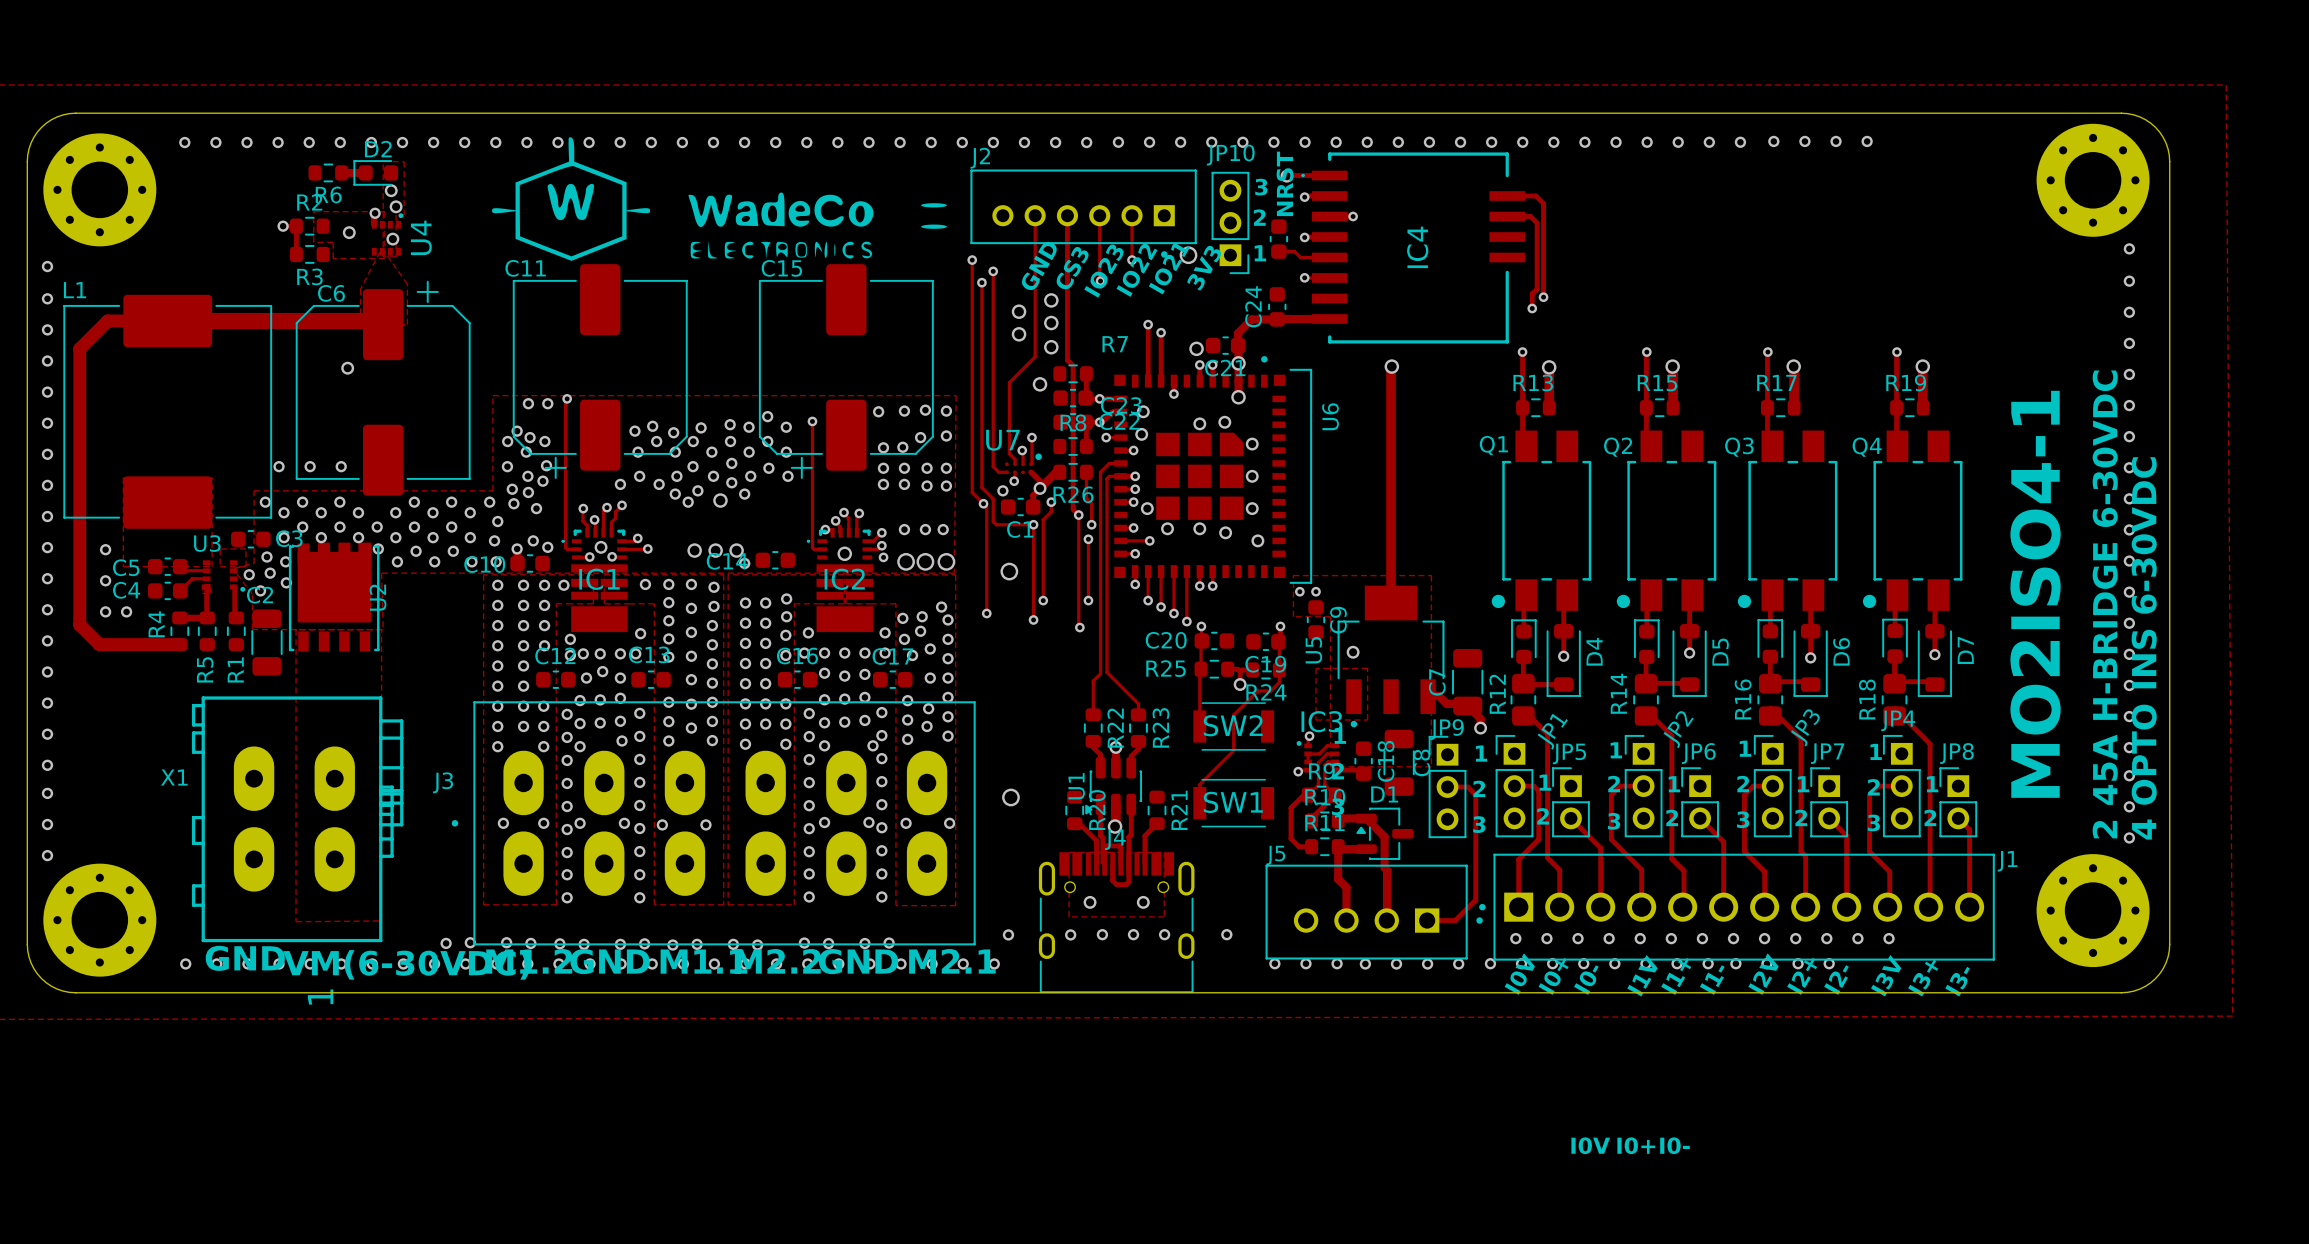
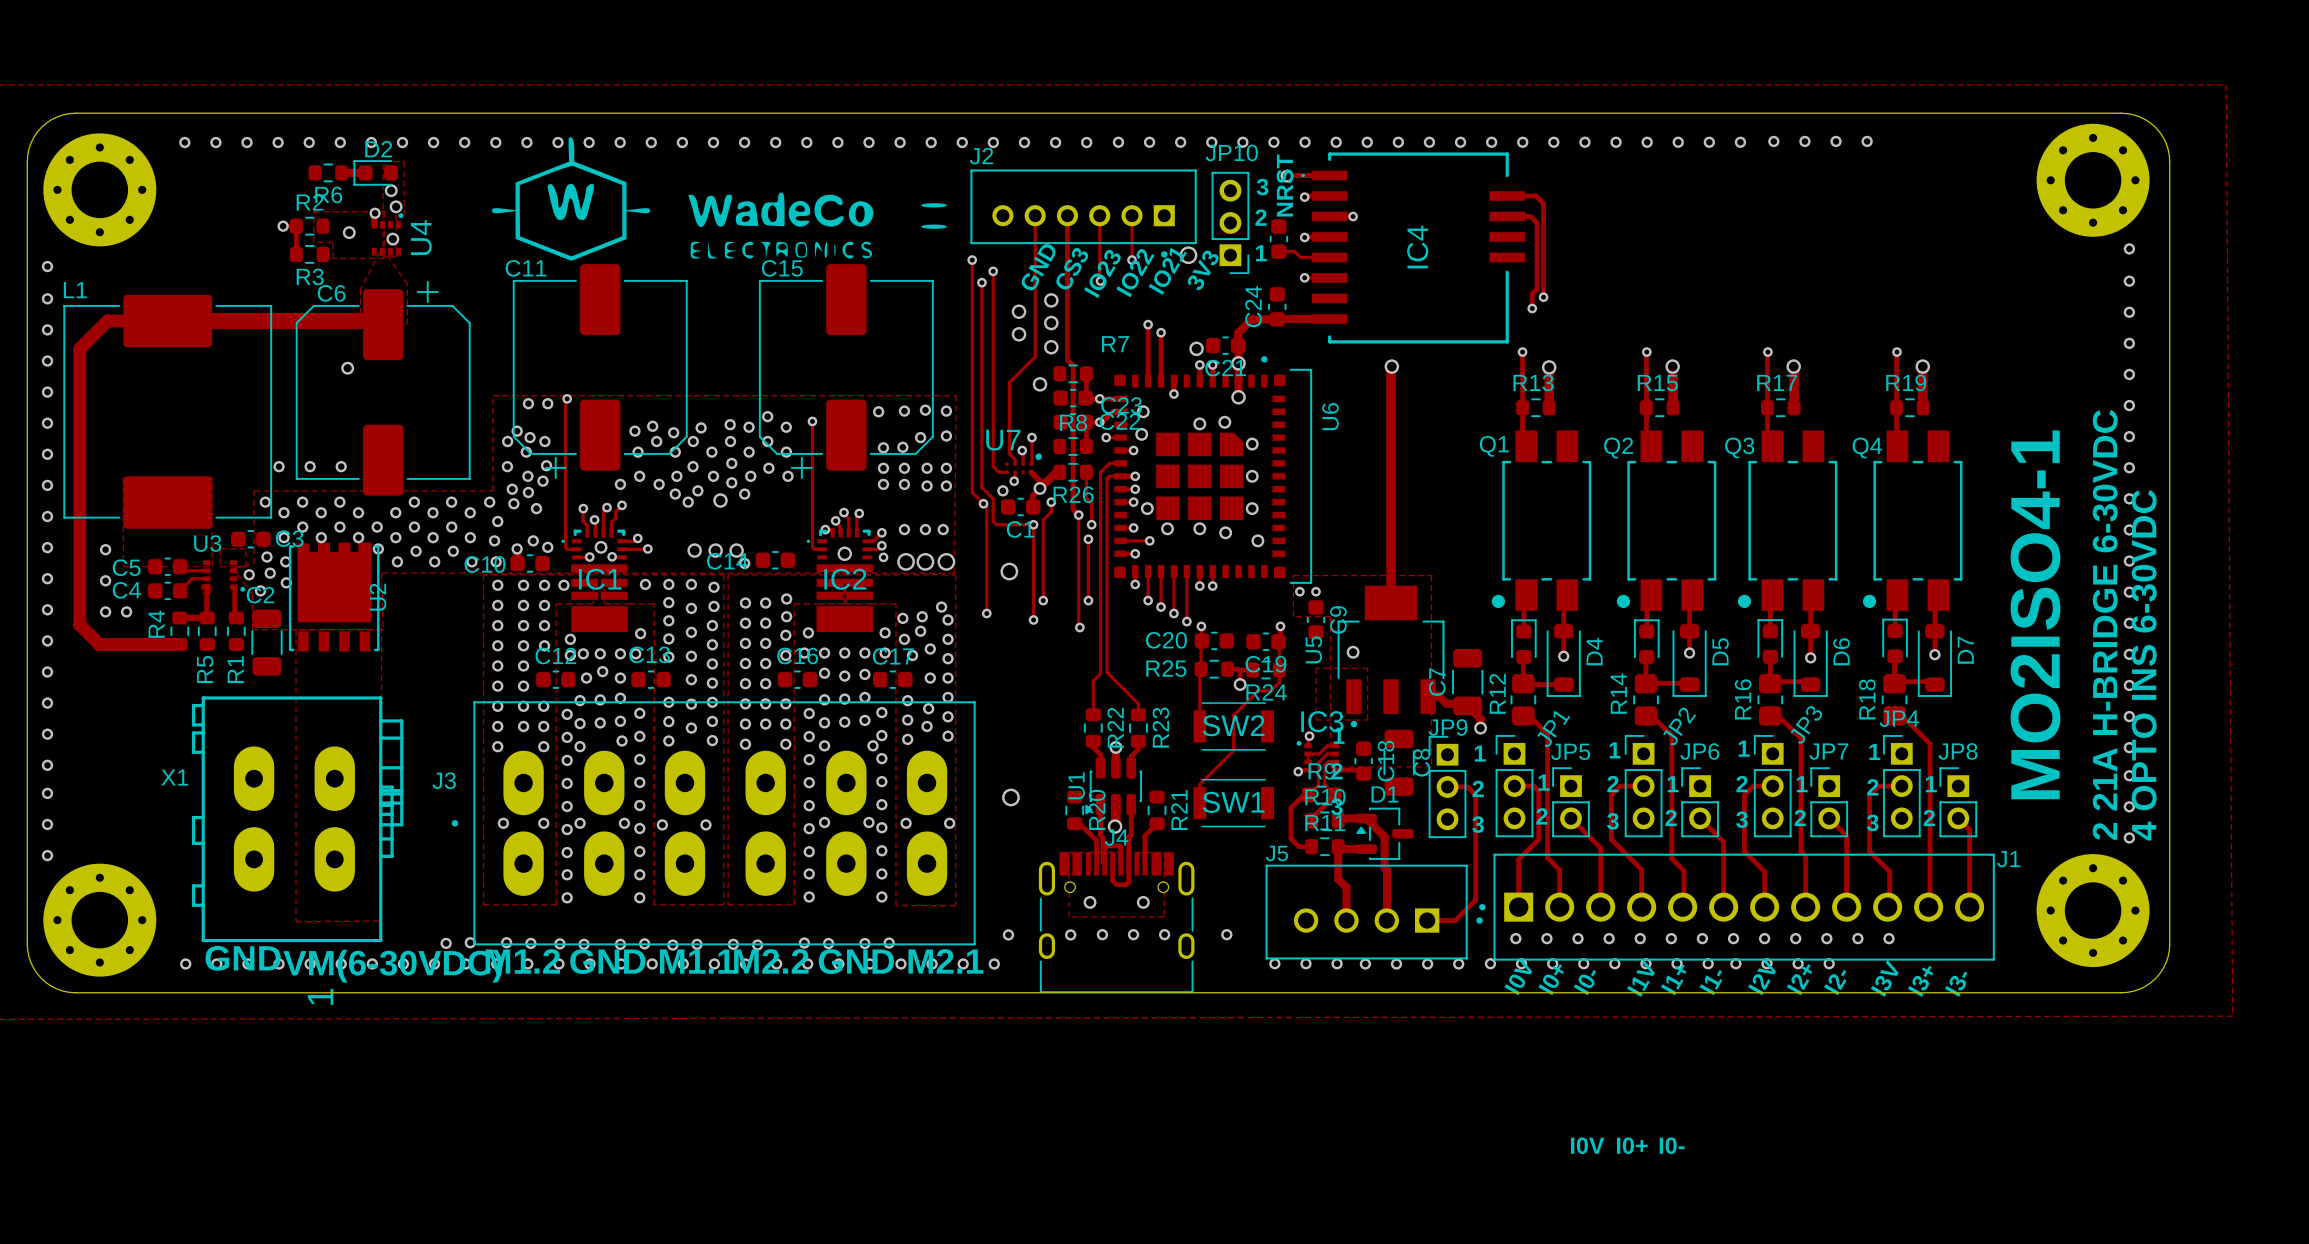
text: 2 45A H-BRIDGE 6-30VDC (2105, 604) -> 2 21A H-BRIDGE 6-30VDC (2105, 624)

